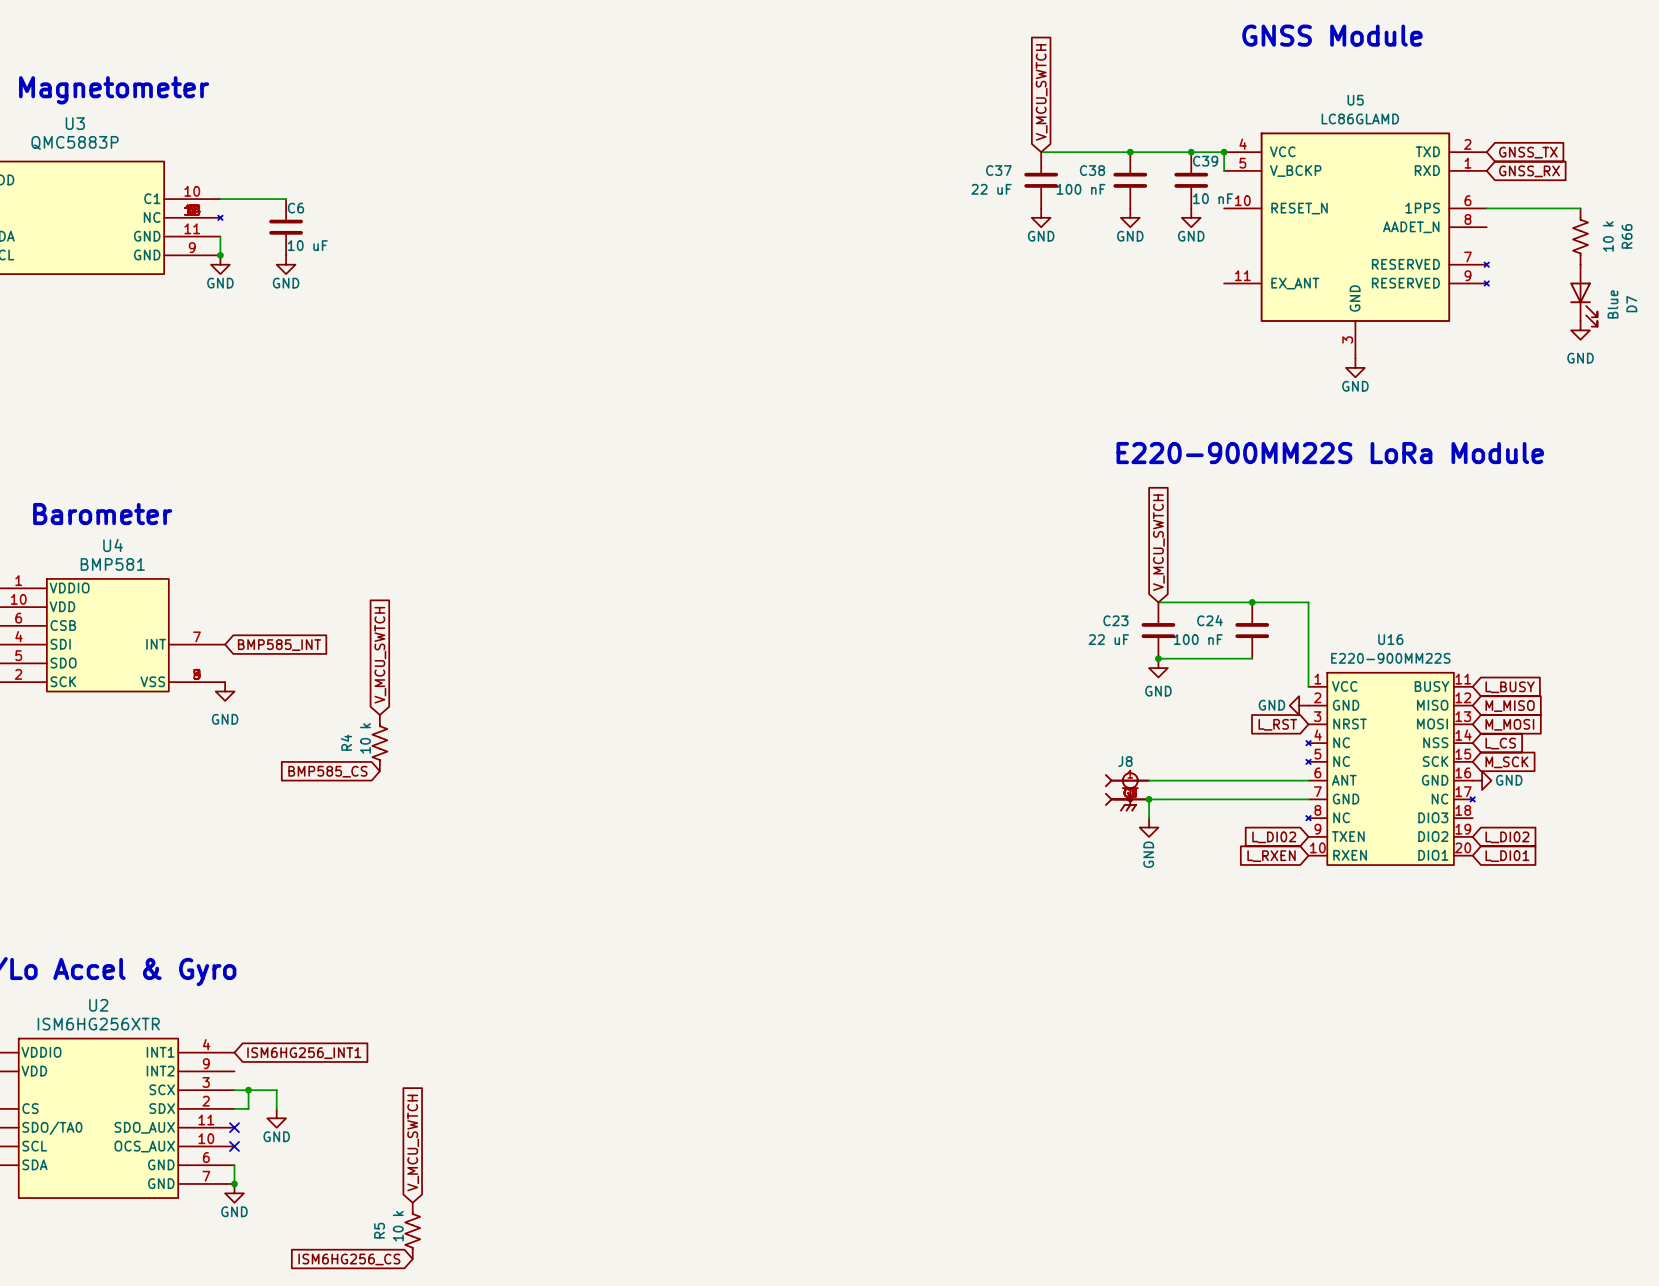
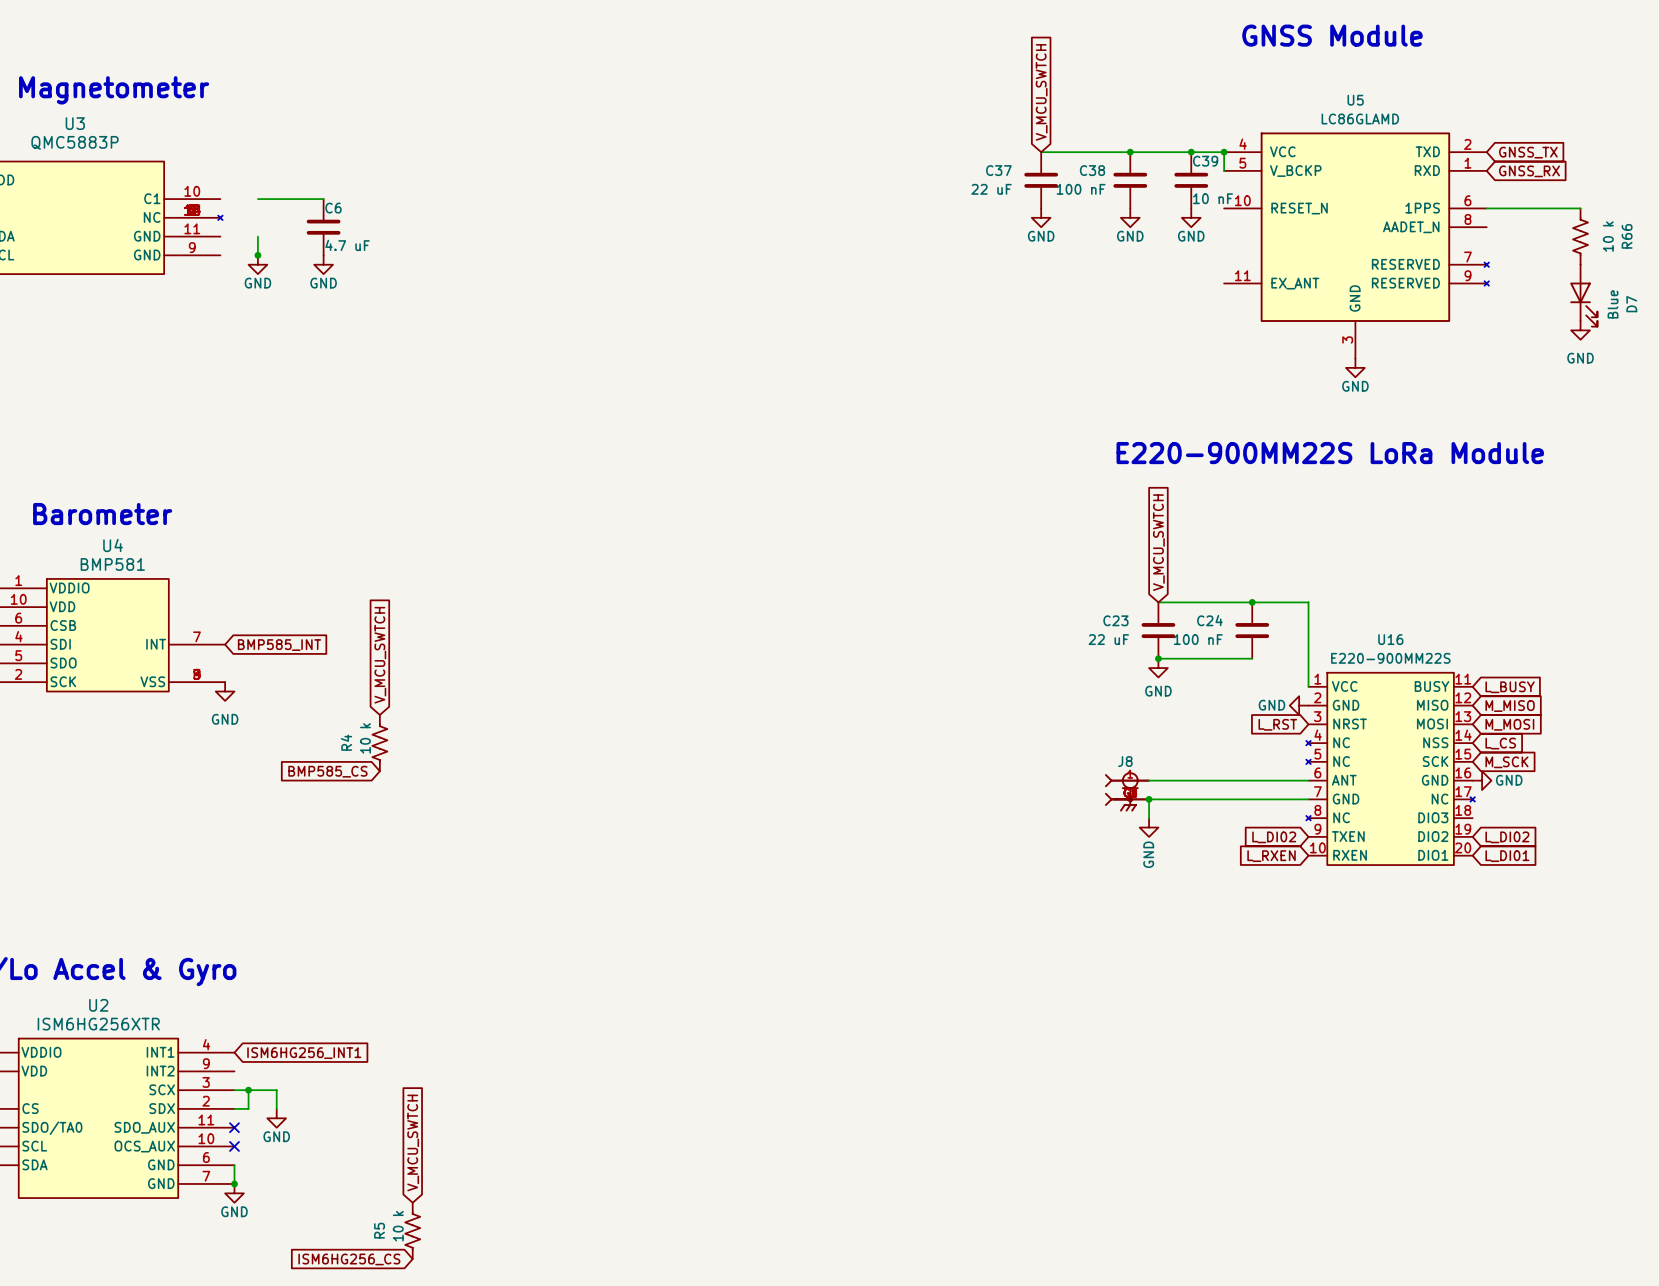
wire: (220, 199) (257, 199) -> (286, 199) (323, 199)
C6 position: (286, 227) -> (323, 227)
wire: (220, 236) (220, 255) -> (257, 236) (257, 255)
C6 value: 10 uF (307, 245) -> 4.7 uF (347, 245)
junction position: (220, 255) -> (257, 255)
power symbol: GND (220, 264) -> none
power symbol: none -> GND (257, 264)
power symbol: GND (286, 264) -> none
power symbol: none -> GND (323, 264)

